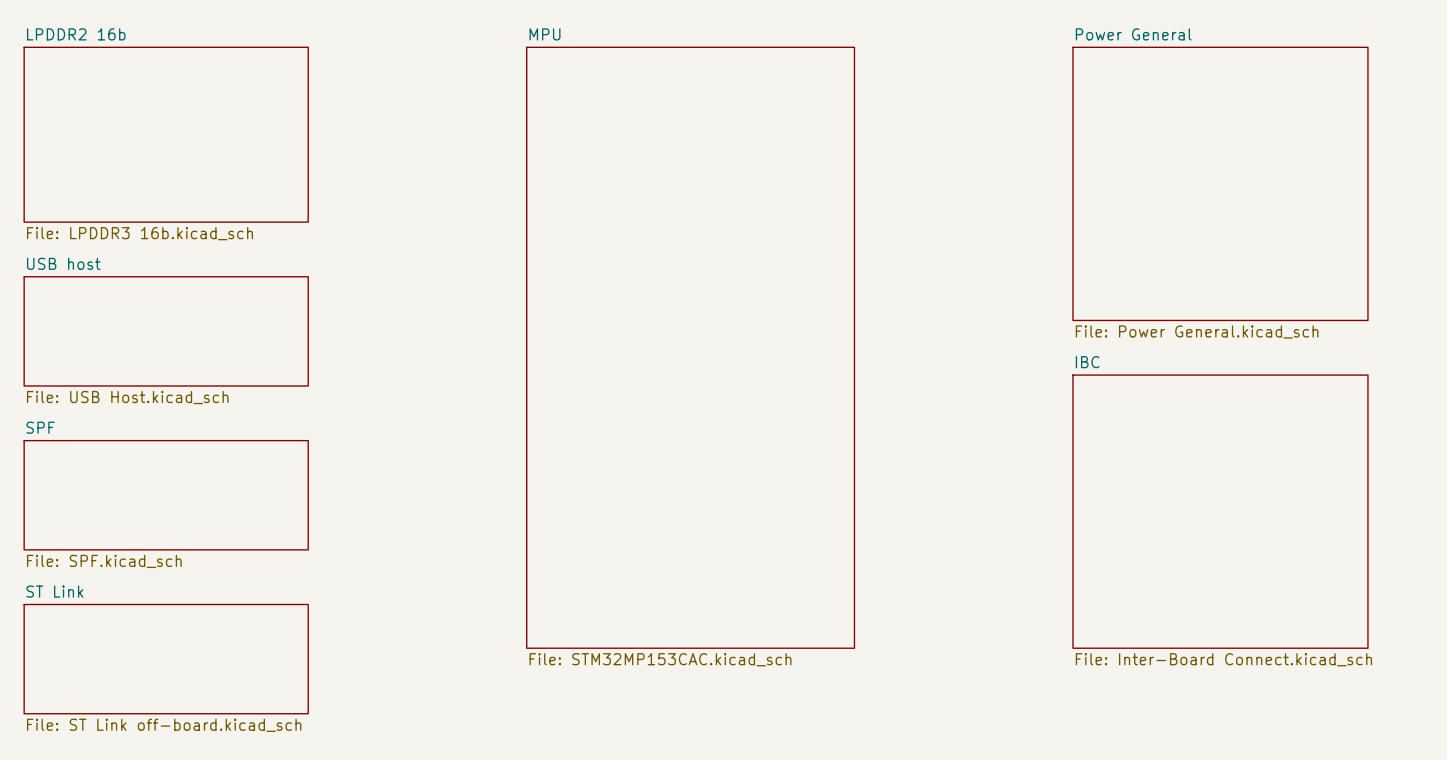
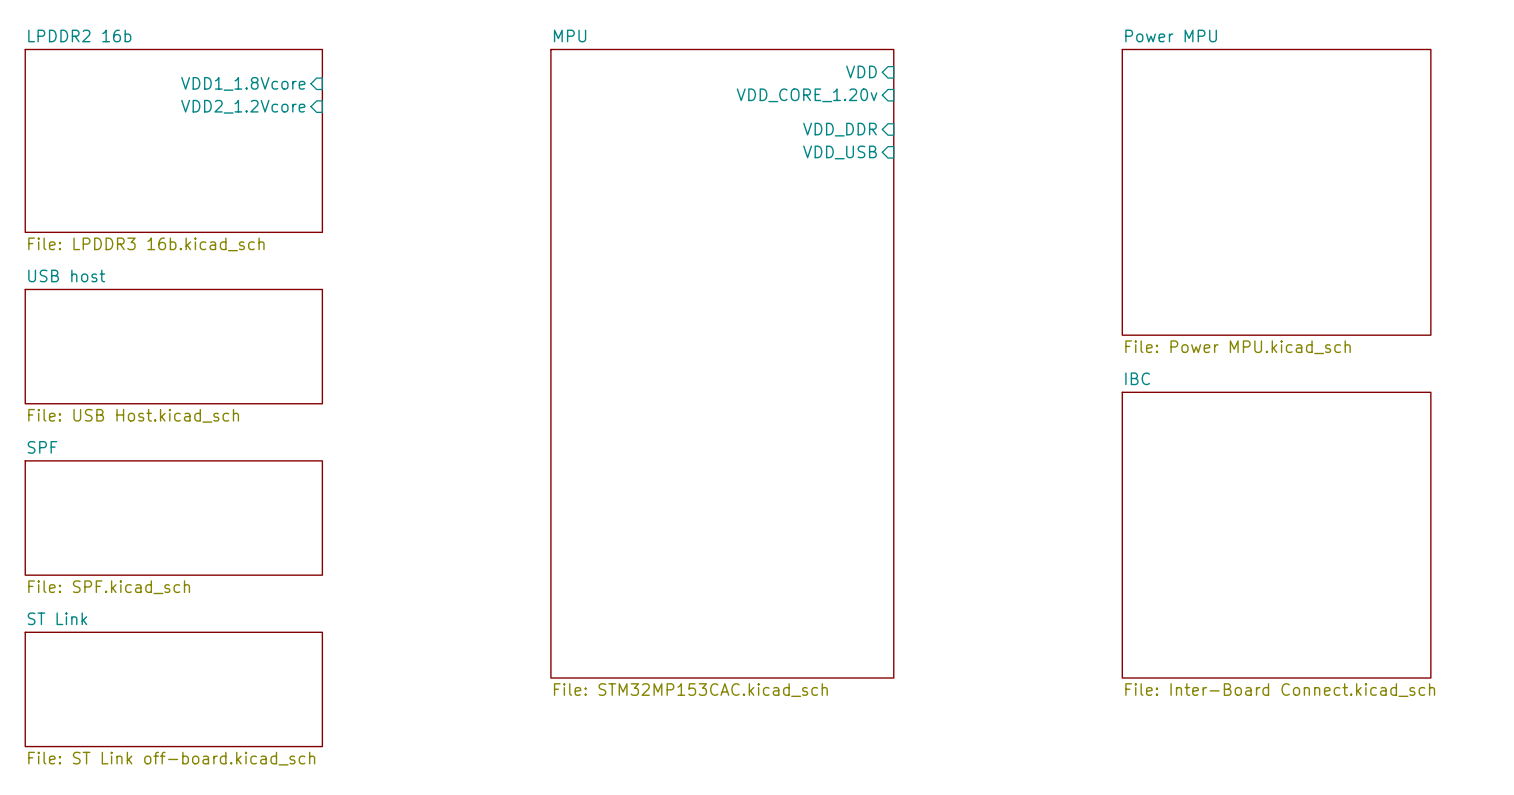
sheet Power General name: Power General (1133, 34) -> Power MPU (1171, 35)
sheet pin: none -> VDD (861, 71)
sheet pin: none -> VDD1_1.8Vcore (243, 83)
sheet pin: none -> VDD_CORE_1.20v (807, 95)
sheet pin: none -> VDD2_1.2Vcore (243, 106)
sheet pin: none -> VDD_DDR (839, 129)
sheet pin: none -> VDD_USB (839, 152)
sheet Power General value: File: Power General.kicad_sch (1197, 331) -> File: Power MPU.kicad_sch (1238, 347)

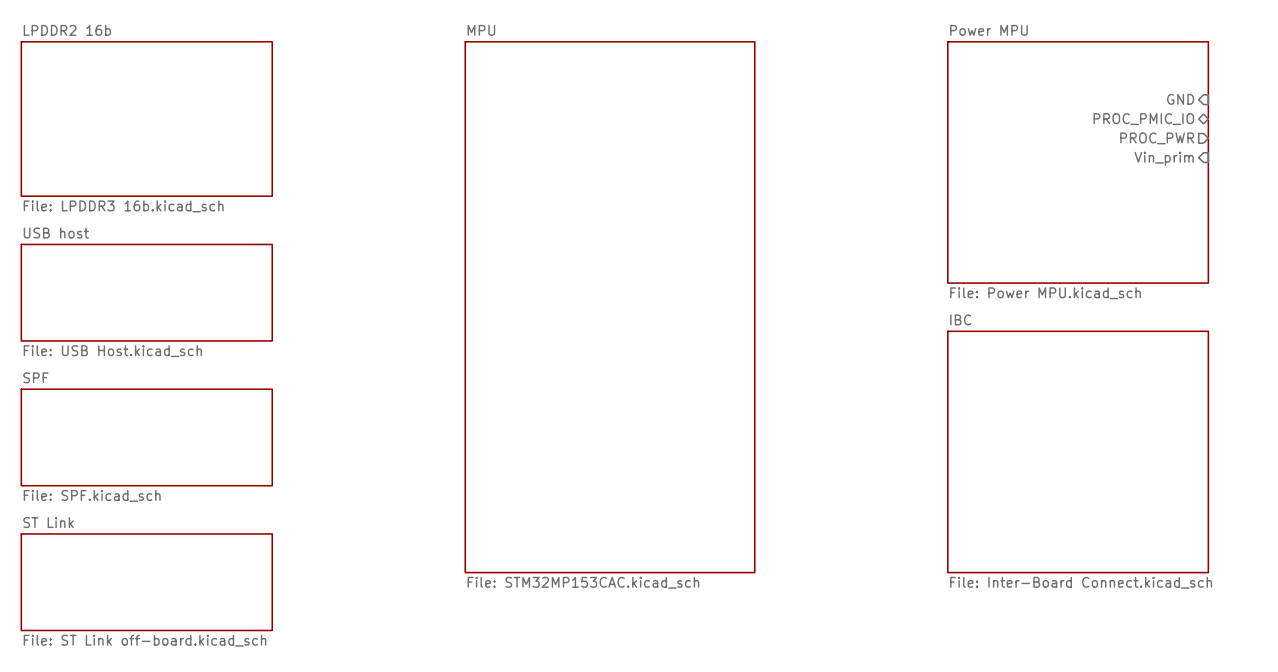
sheet pin: VDD (861, 71) -> none
sheet pin: VDD1_1.8Vcore (243, 83) -> none
sheet pin: VDD_CORE_1.20v (807, 95) -> none
sheet pin: VDD2_1.2Vcore (243, 106) -> none
sheet pin: none -> GND (1180, 99)
sheet pin: VDD_DDR (839, 129) -> none
sheet pin: none -> PROC_PMIC_IO (1143, 119)
sheet pin: VDD_USB (839, 152) -> none
sheet pin: none -> PROC_PWR (1157, 138)
sheet pin: none -> Vin_prim (1164, 158)

